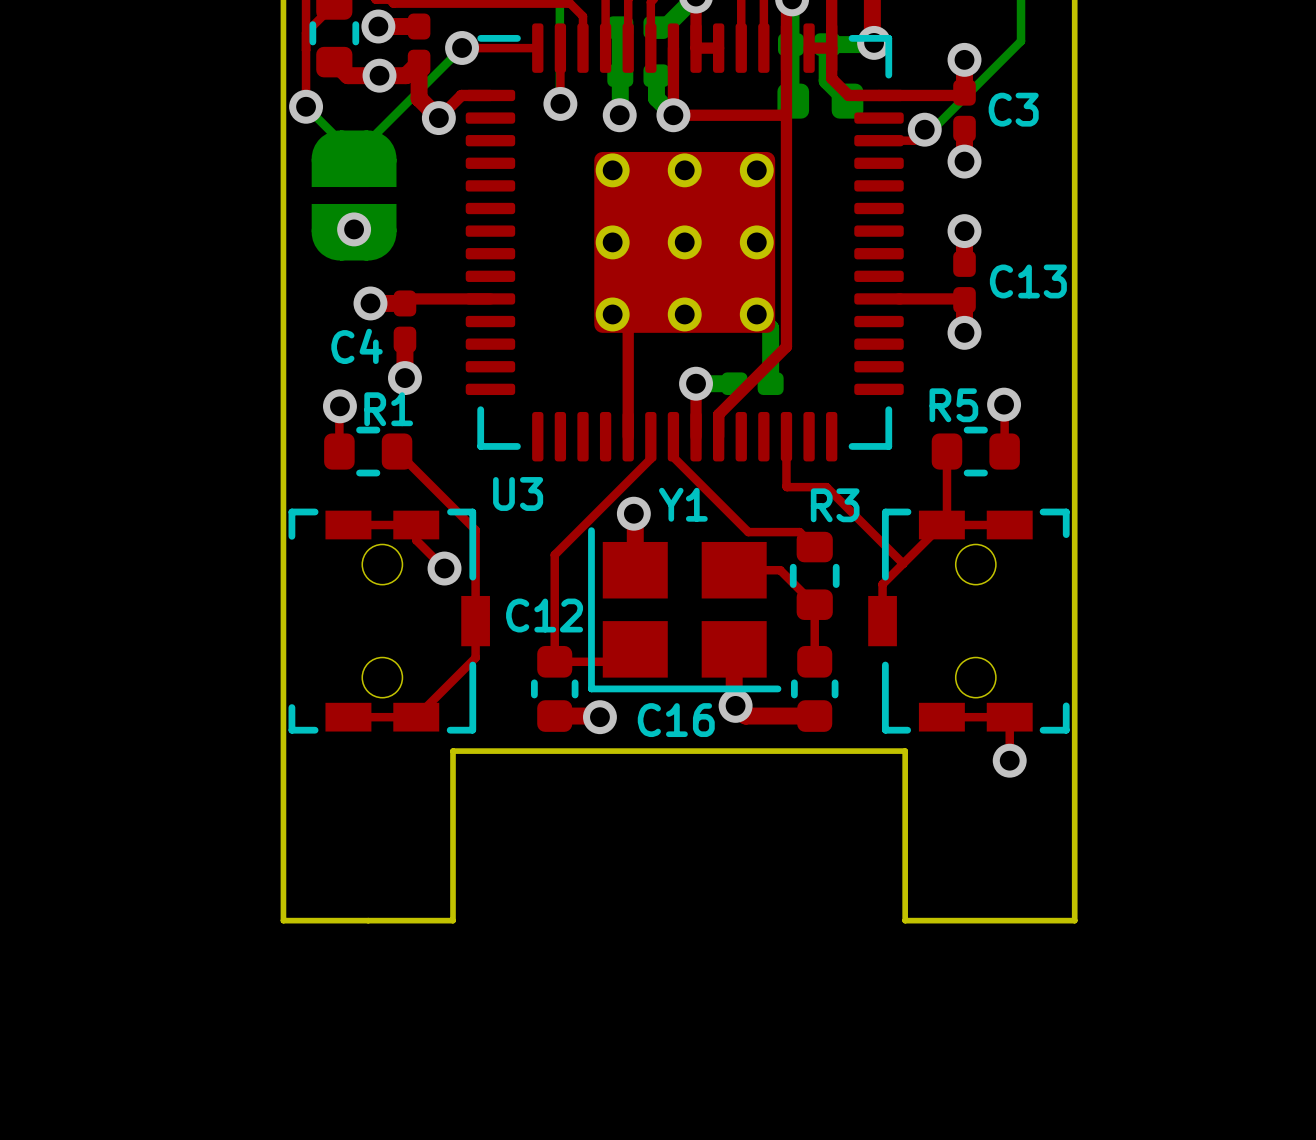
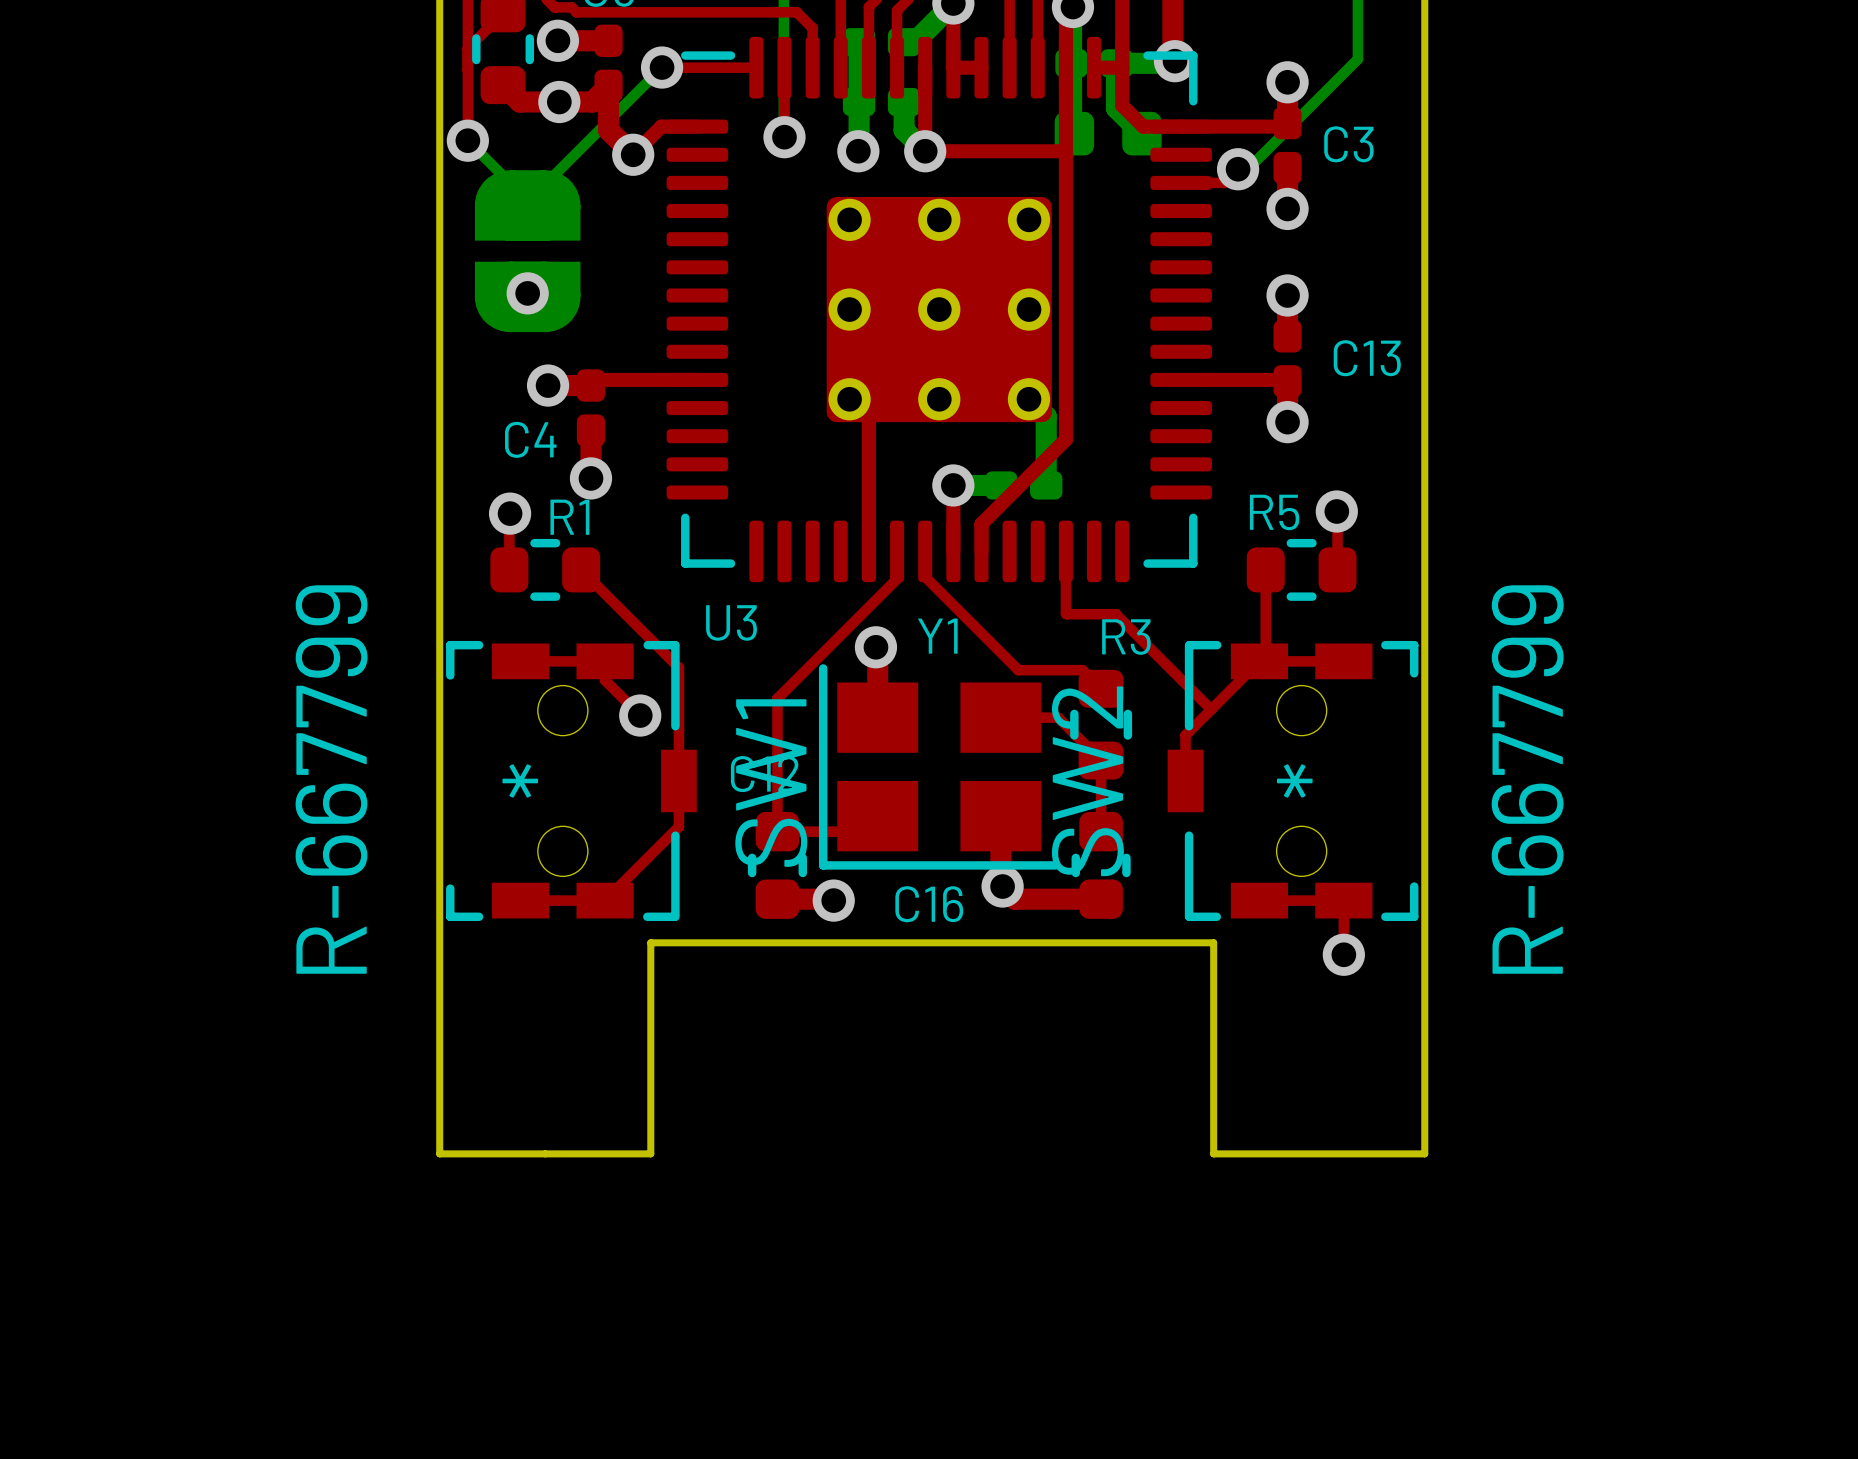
SW1 value: none -> R-667799 (331, 779)
SW2 value: none -> R-667799 (1527, 779)
SW1 text: none -> * (520, 780)
SW1 name: none -> SW1 (771, 783)
SW2 name: none -> SW2 (1087, 781)
SW2 text: none -> * (1294, 780)

